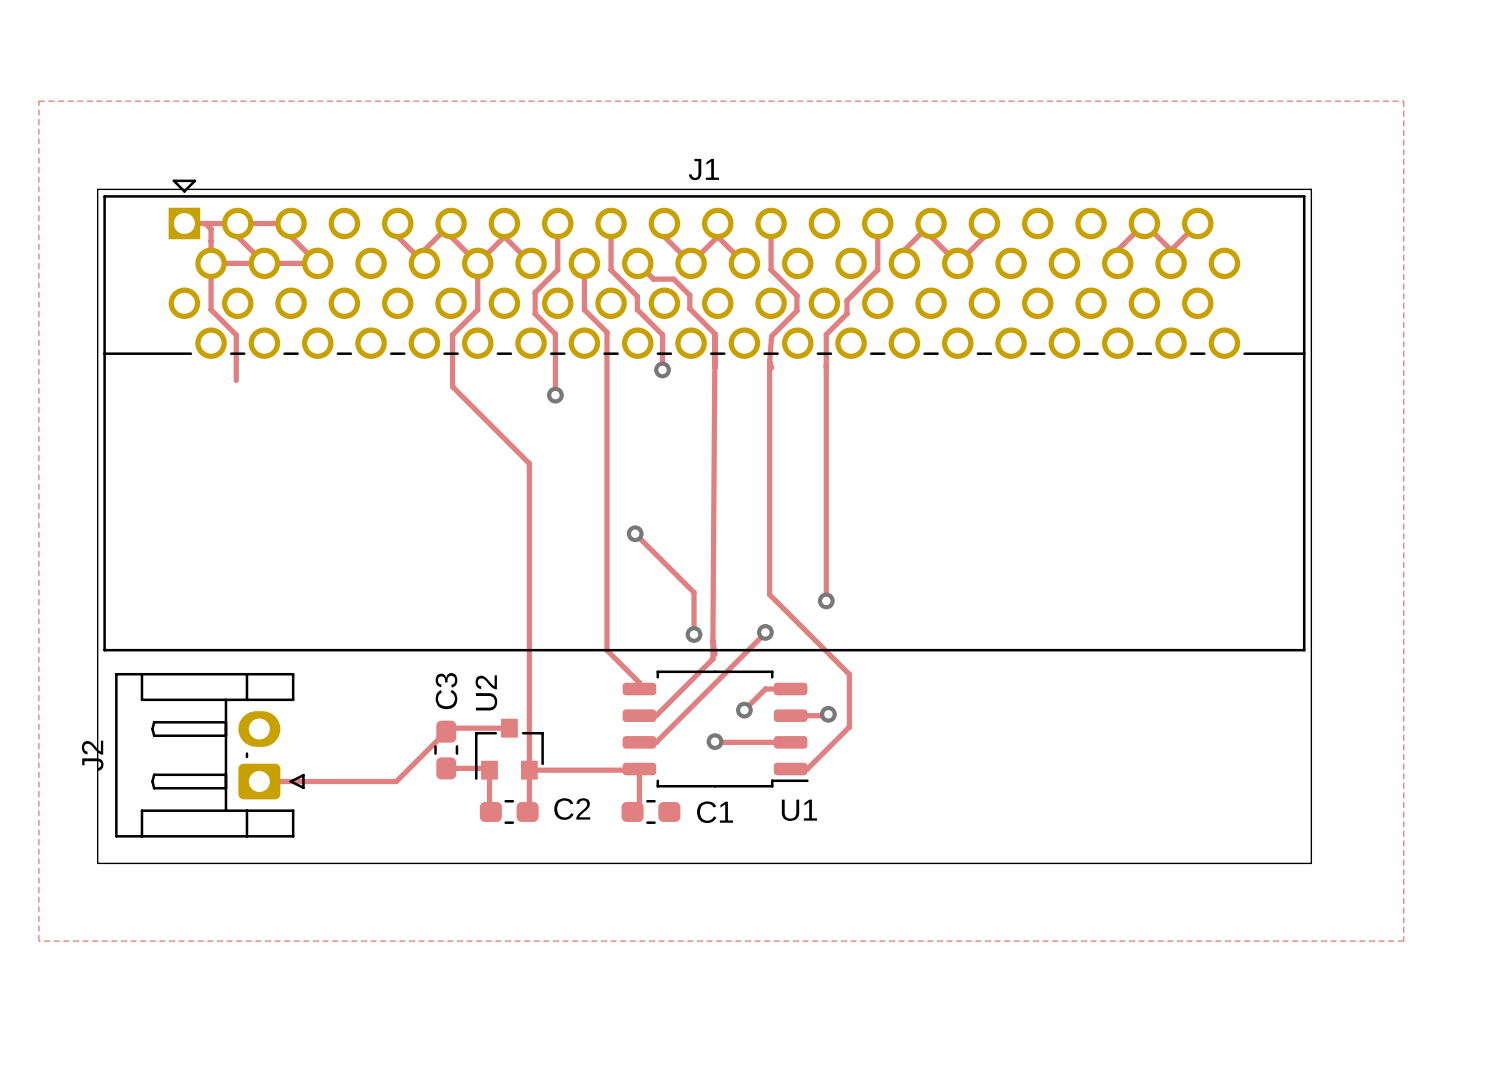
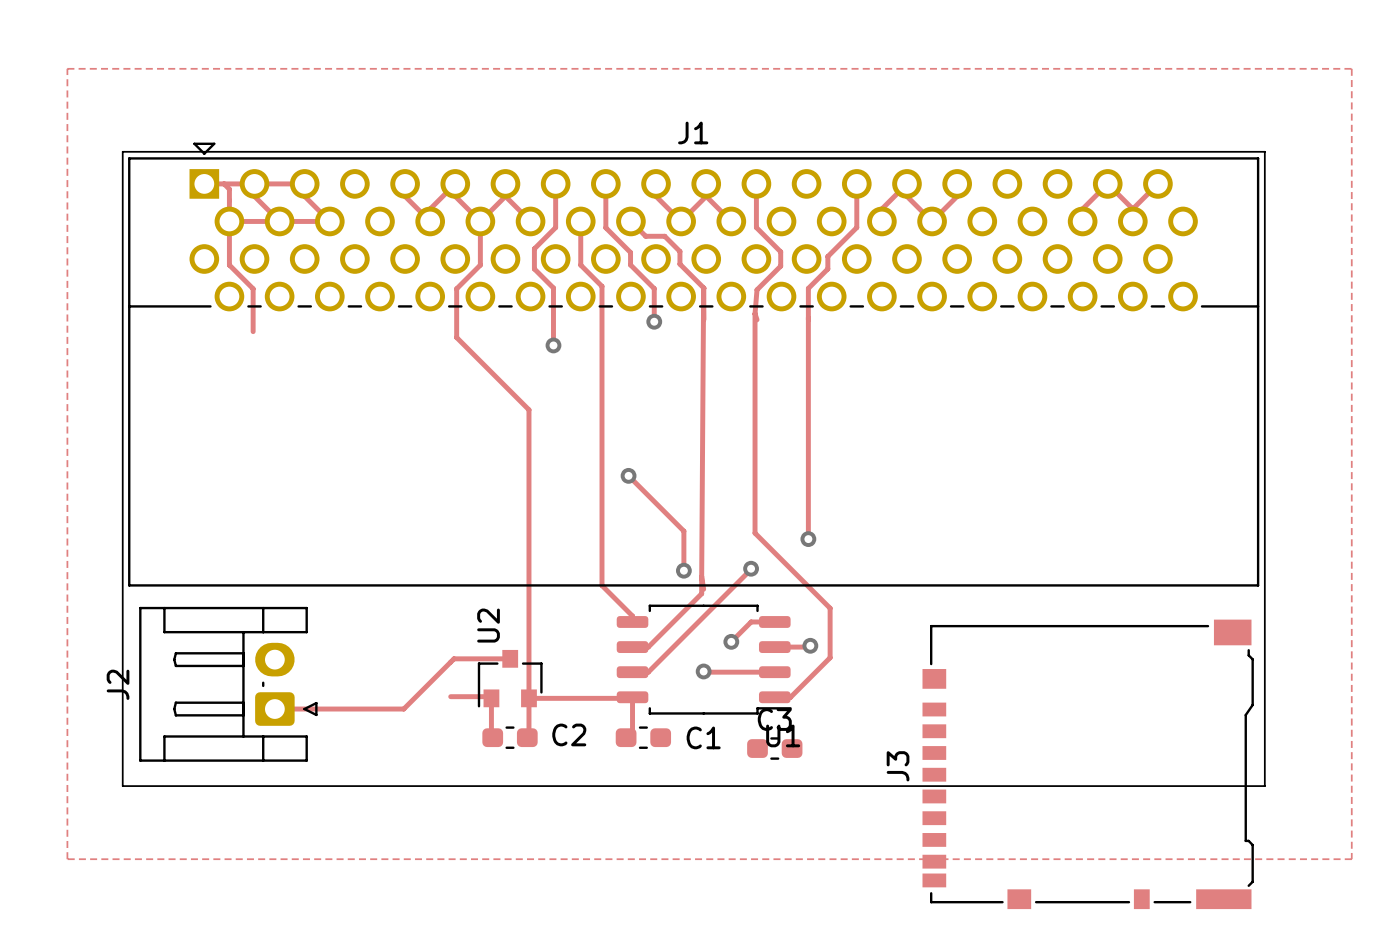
C3 rotation: 0° (446, 750) -> 90° clockwise (774, 748)
C3 position: (446, 750) -> (774, 748)
J3: none -> (1088, 764)

